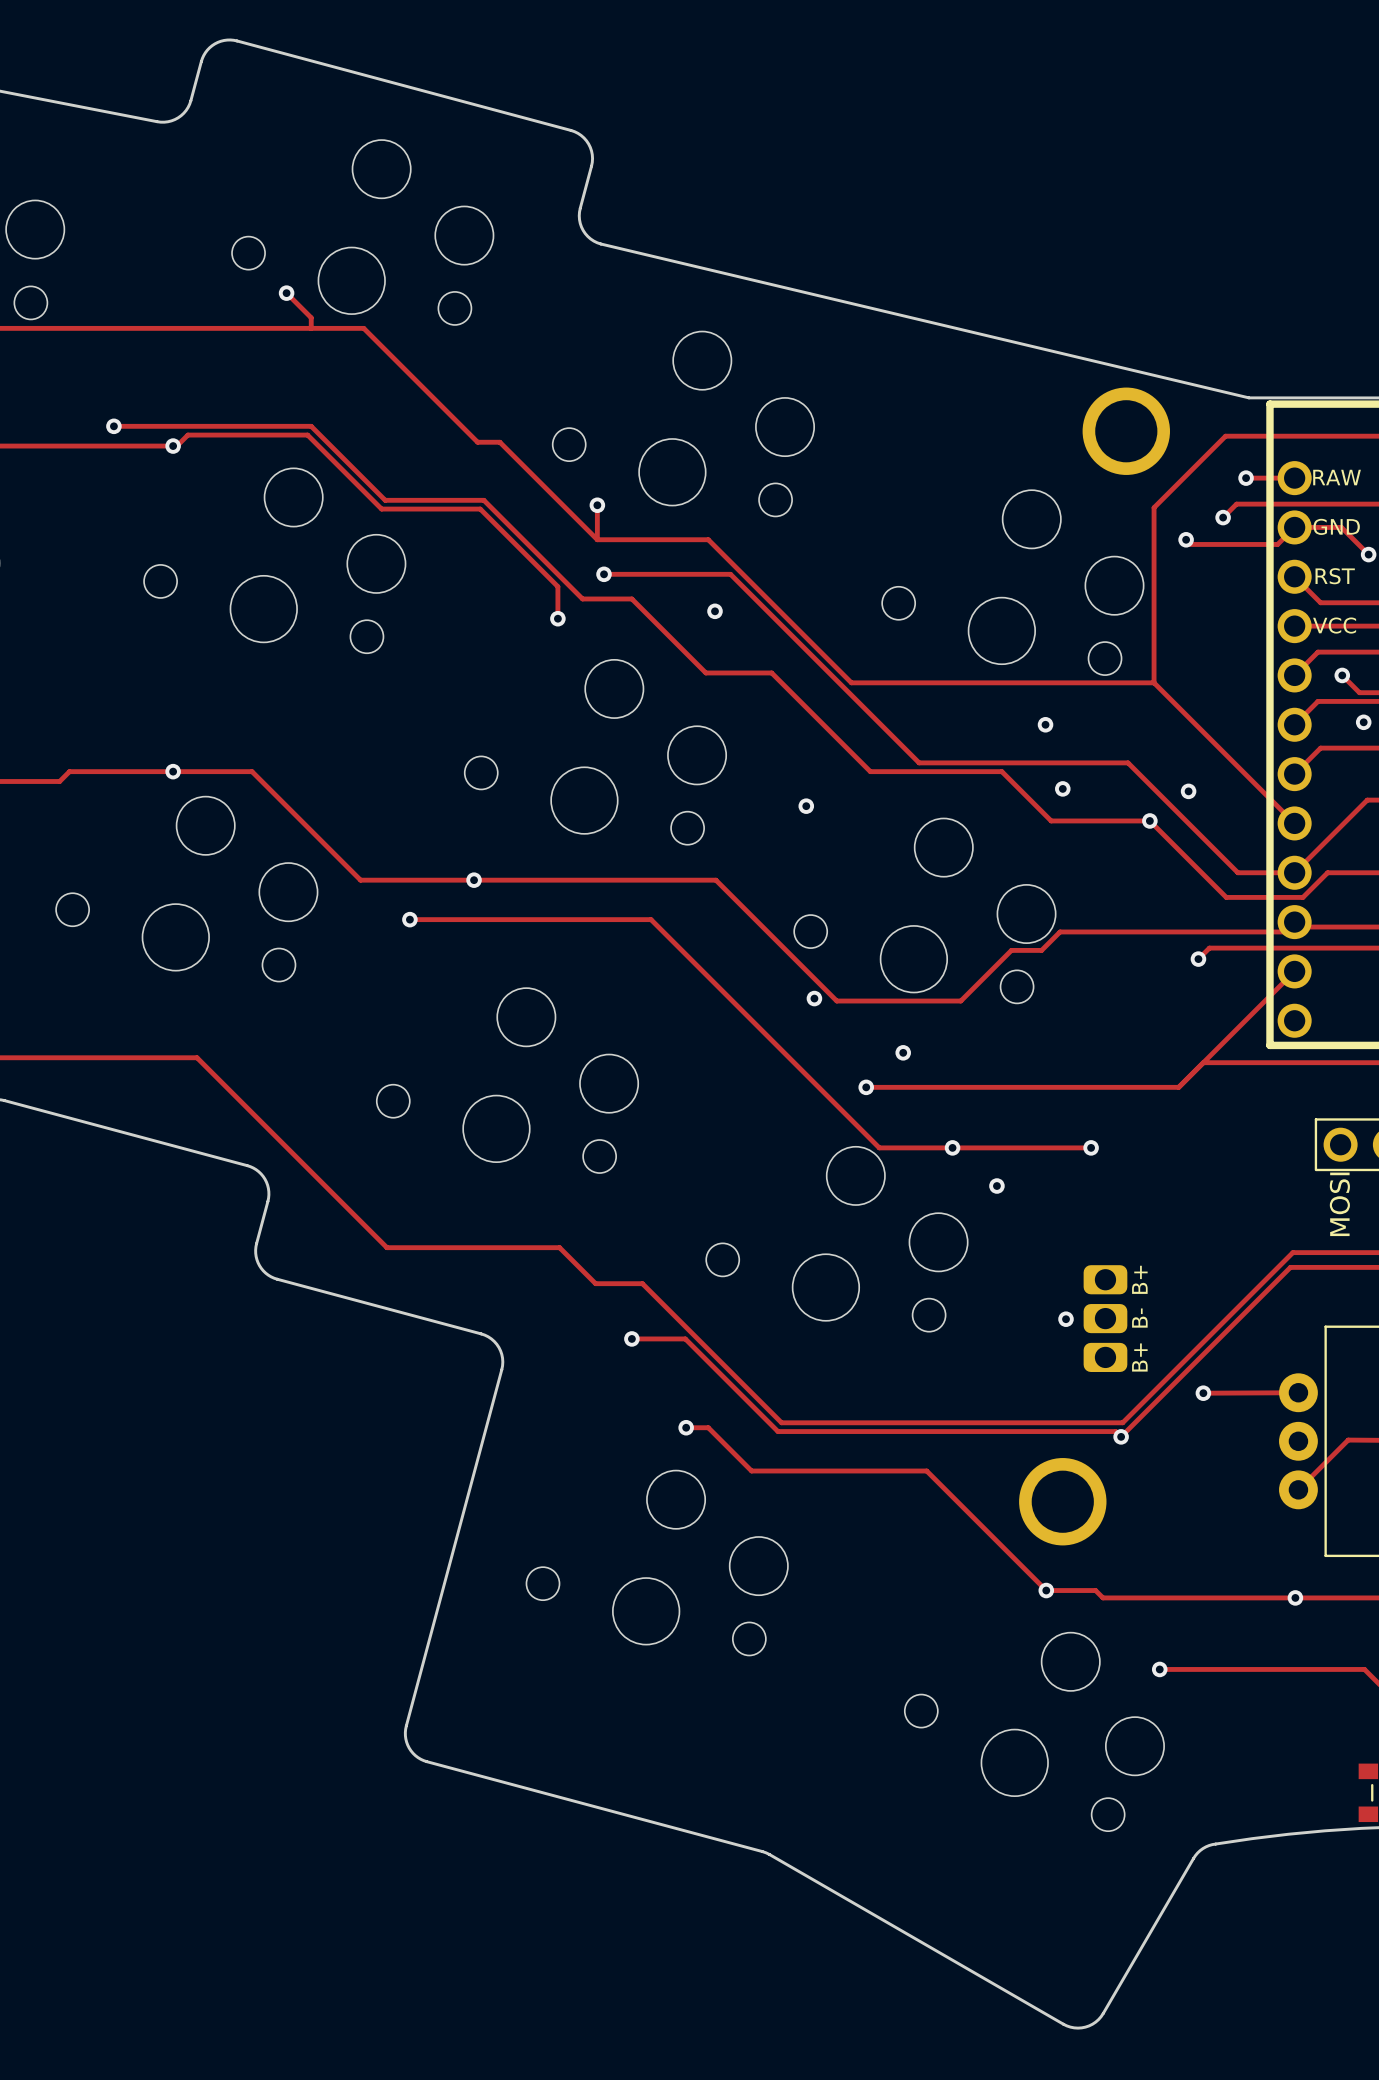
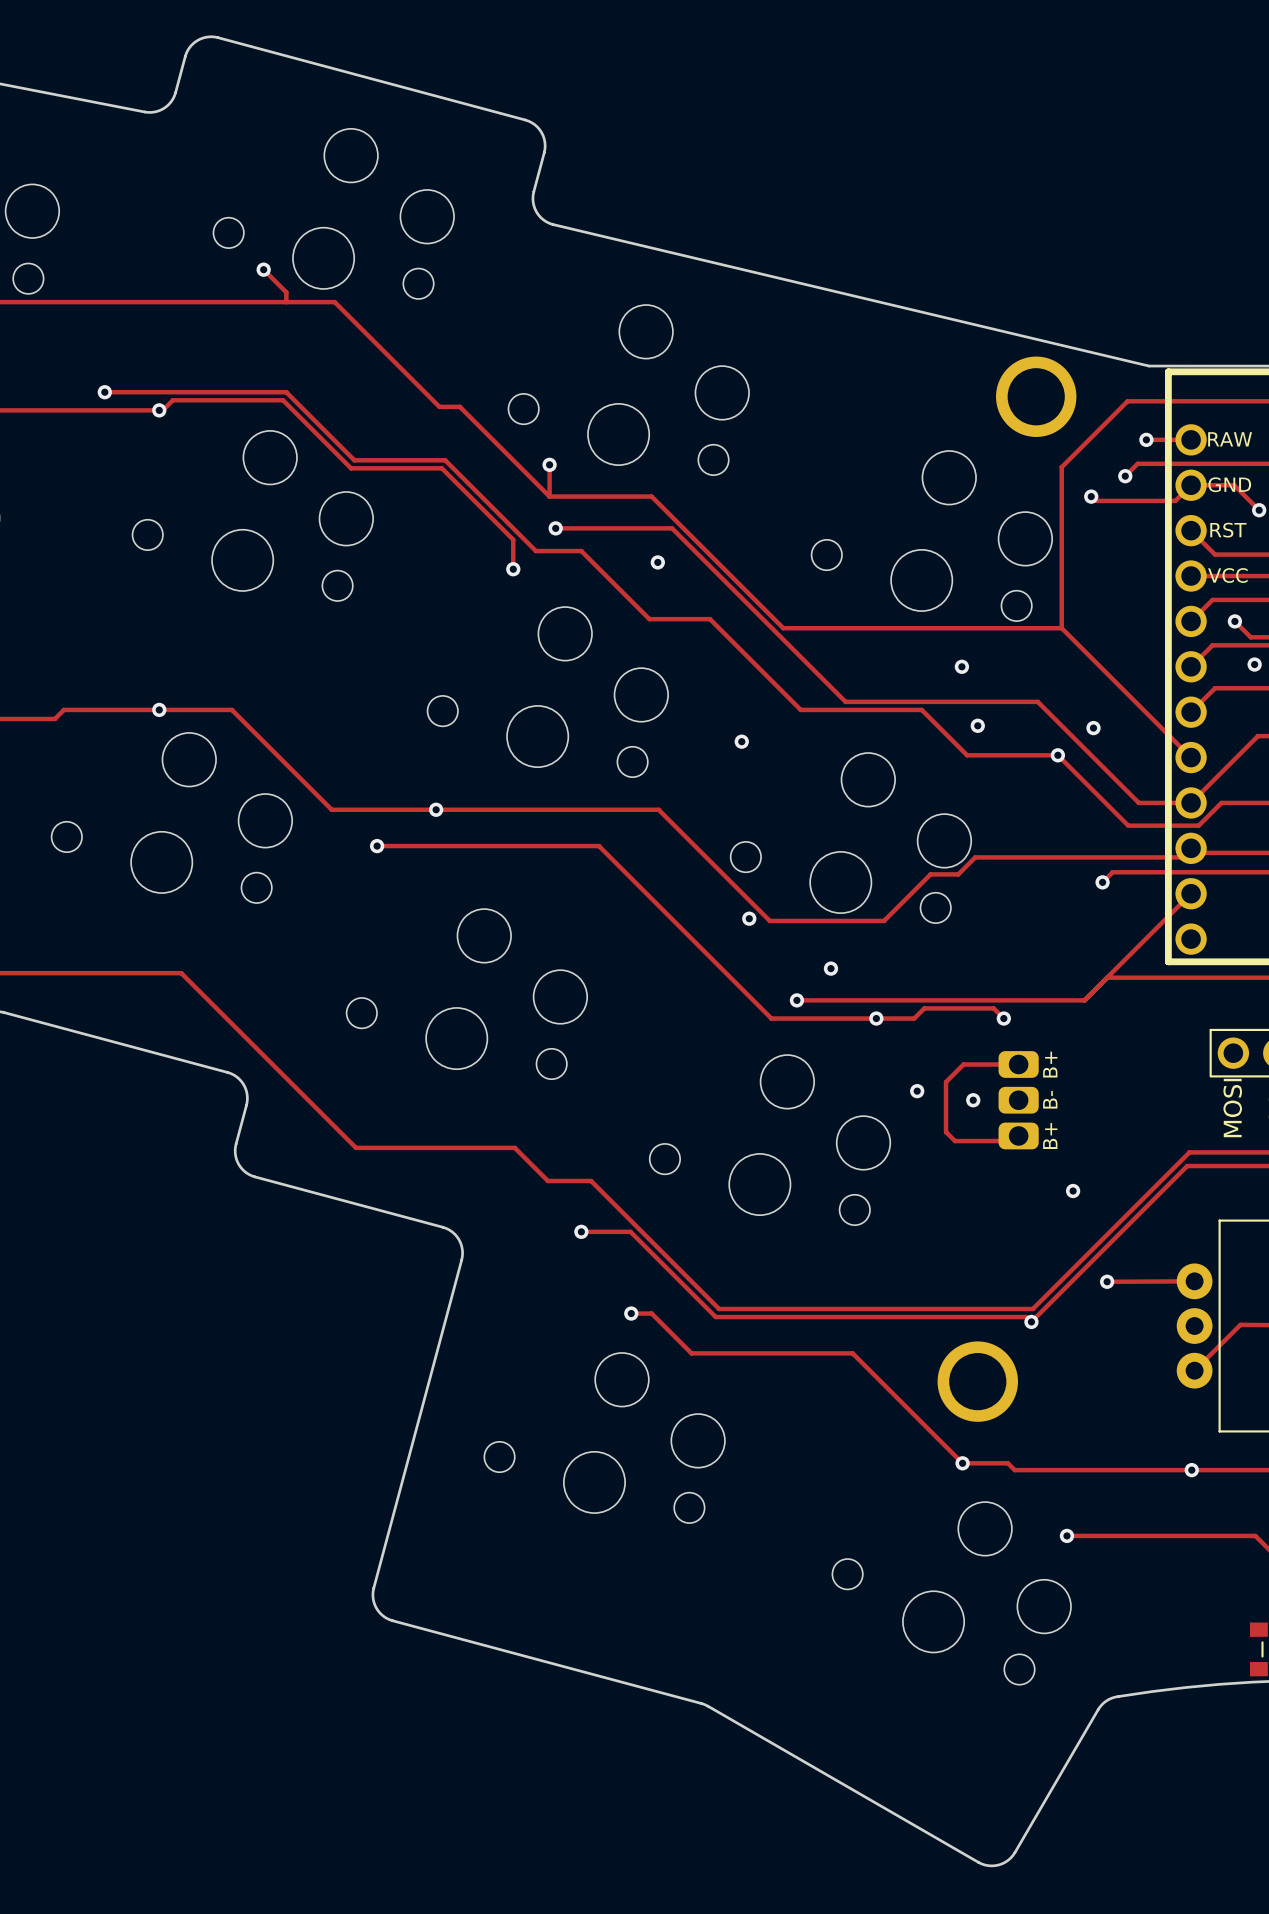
track: (838, 1107) (879, 1147) (1091, 1147) -> (771, 1018) (914, 1018) (924, 1008) (993, 1008) (1003, 1018)
via: none -> (1003, 1018)
via position: (952, 1147) -> (876, 1018)
via: (1091, 1147) -> none
track: none -> (1018, 1064) (963, 1064) (946, 1082) (946, 1132) (955, 1141) (1013, 1141) (1018, 1135)
via: none -> (973, 1100)
via: none -> (1073, 1191)
part position: (1105, 1318) -> (1018, 1100)
via: (1066, 1319) -> none

